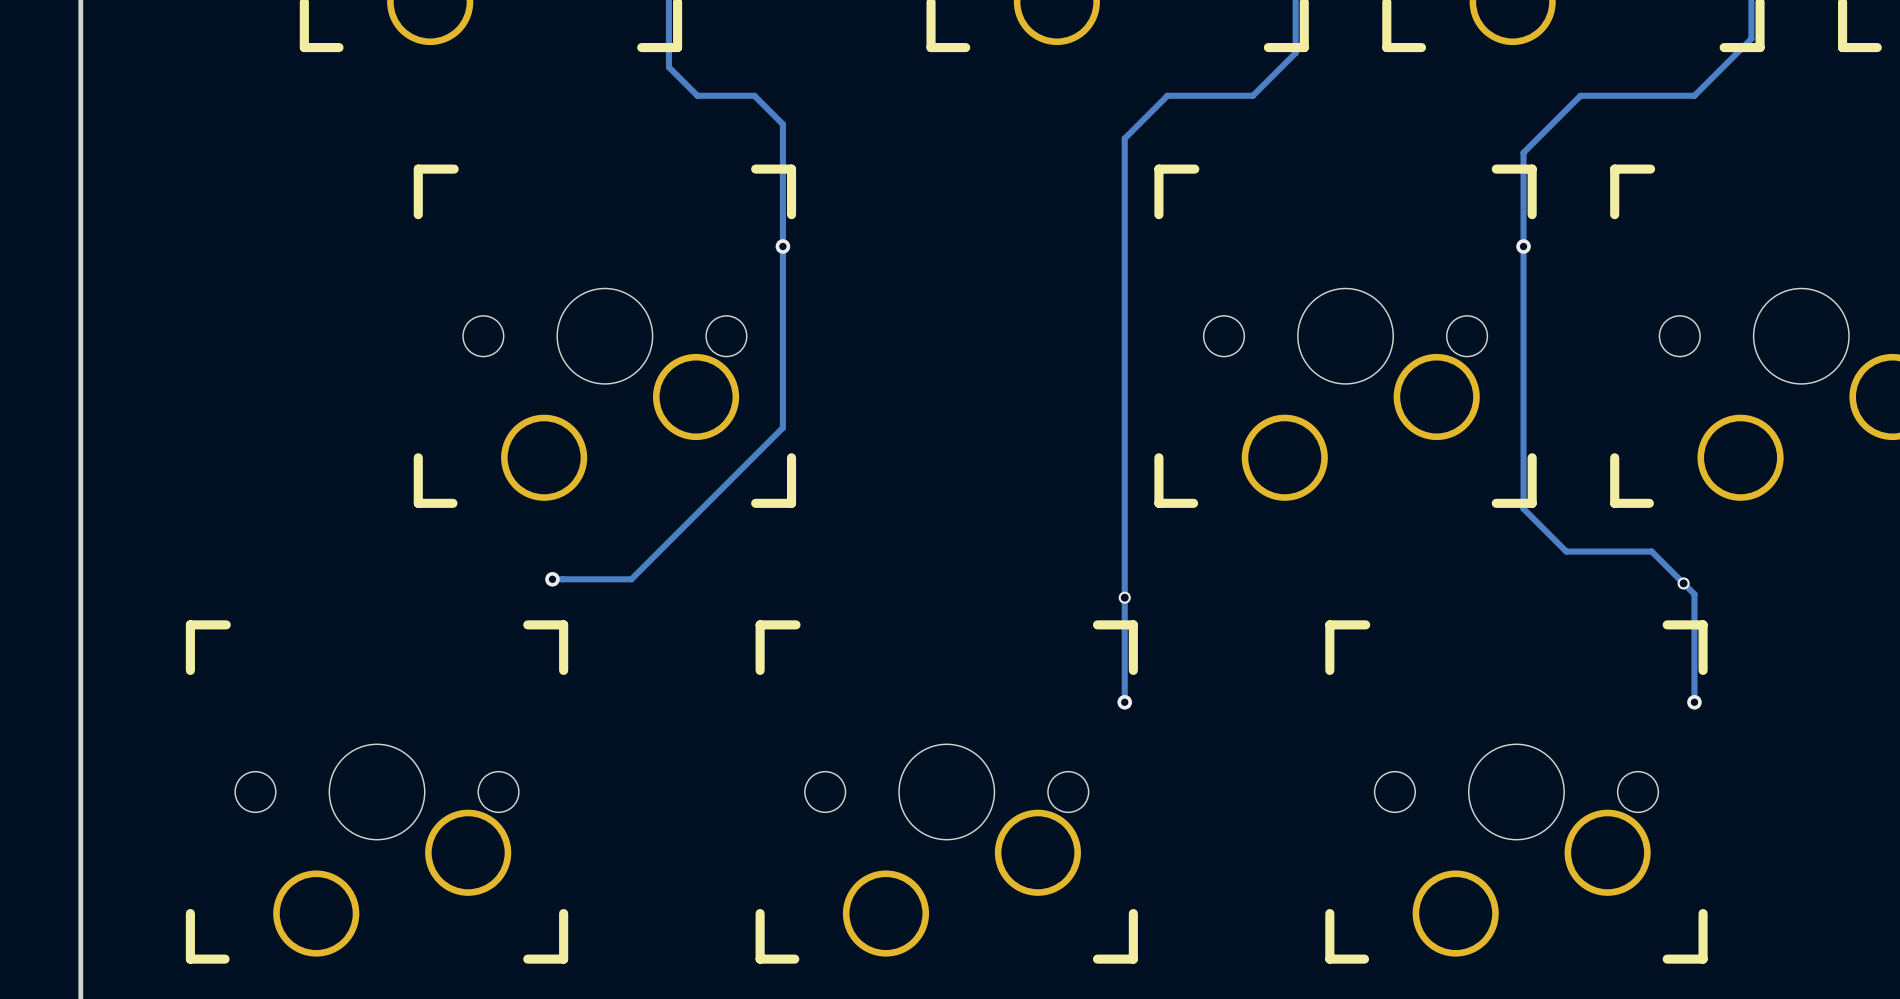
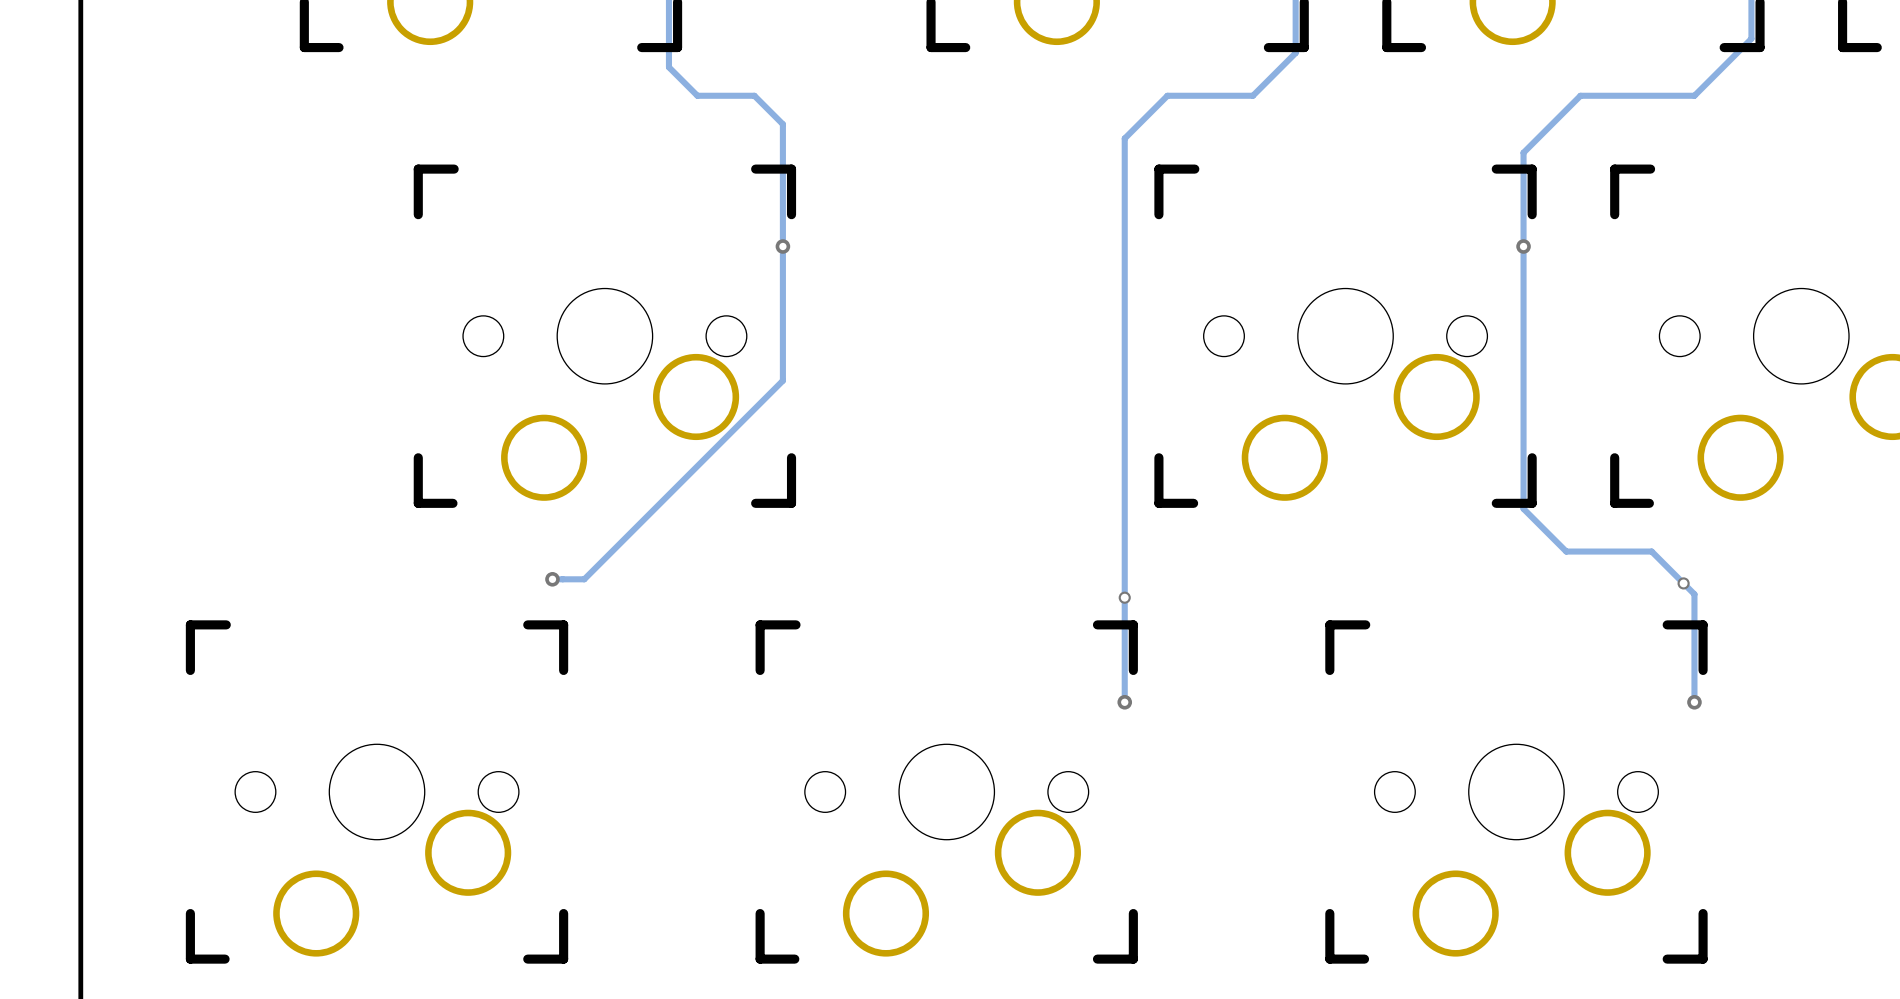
track: (782, 380) (782, 427) (631, 579) (584, 579) -> (782, 380) (584, 579)

